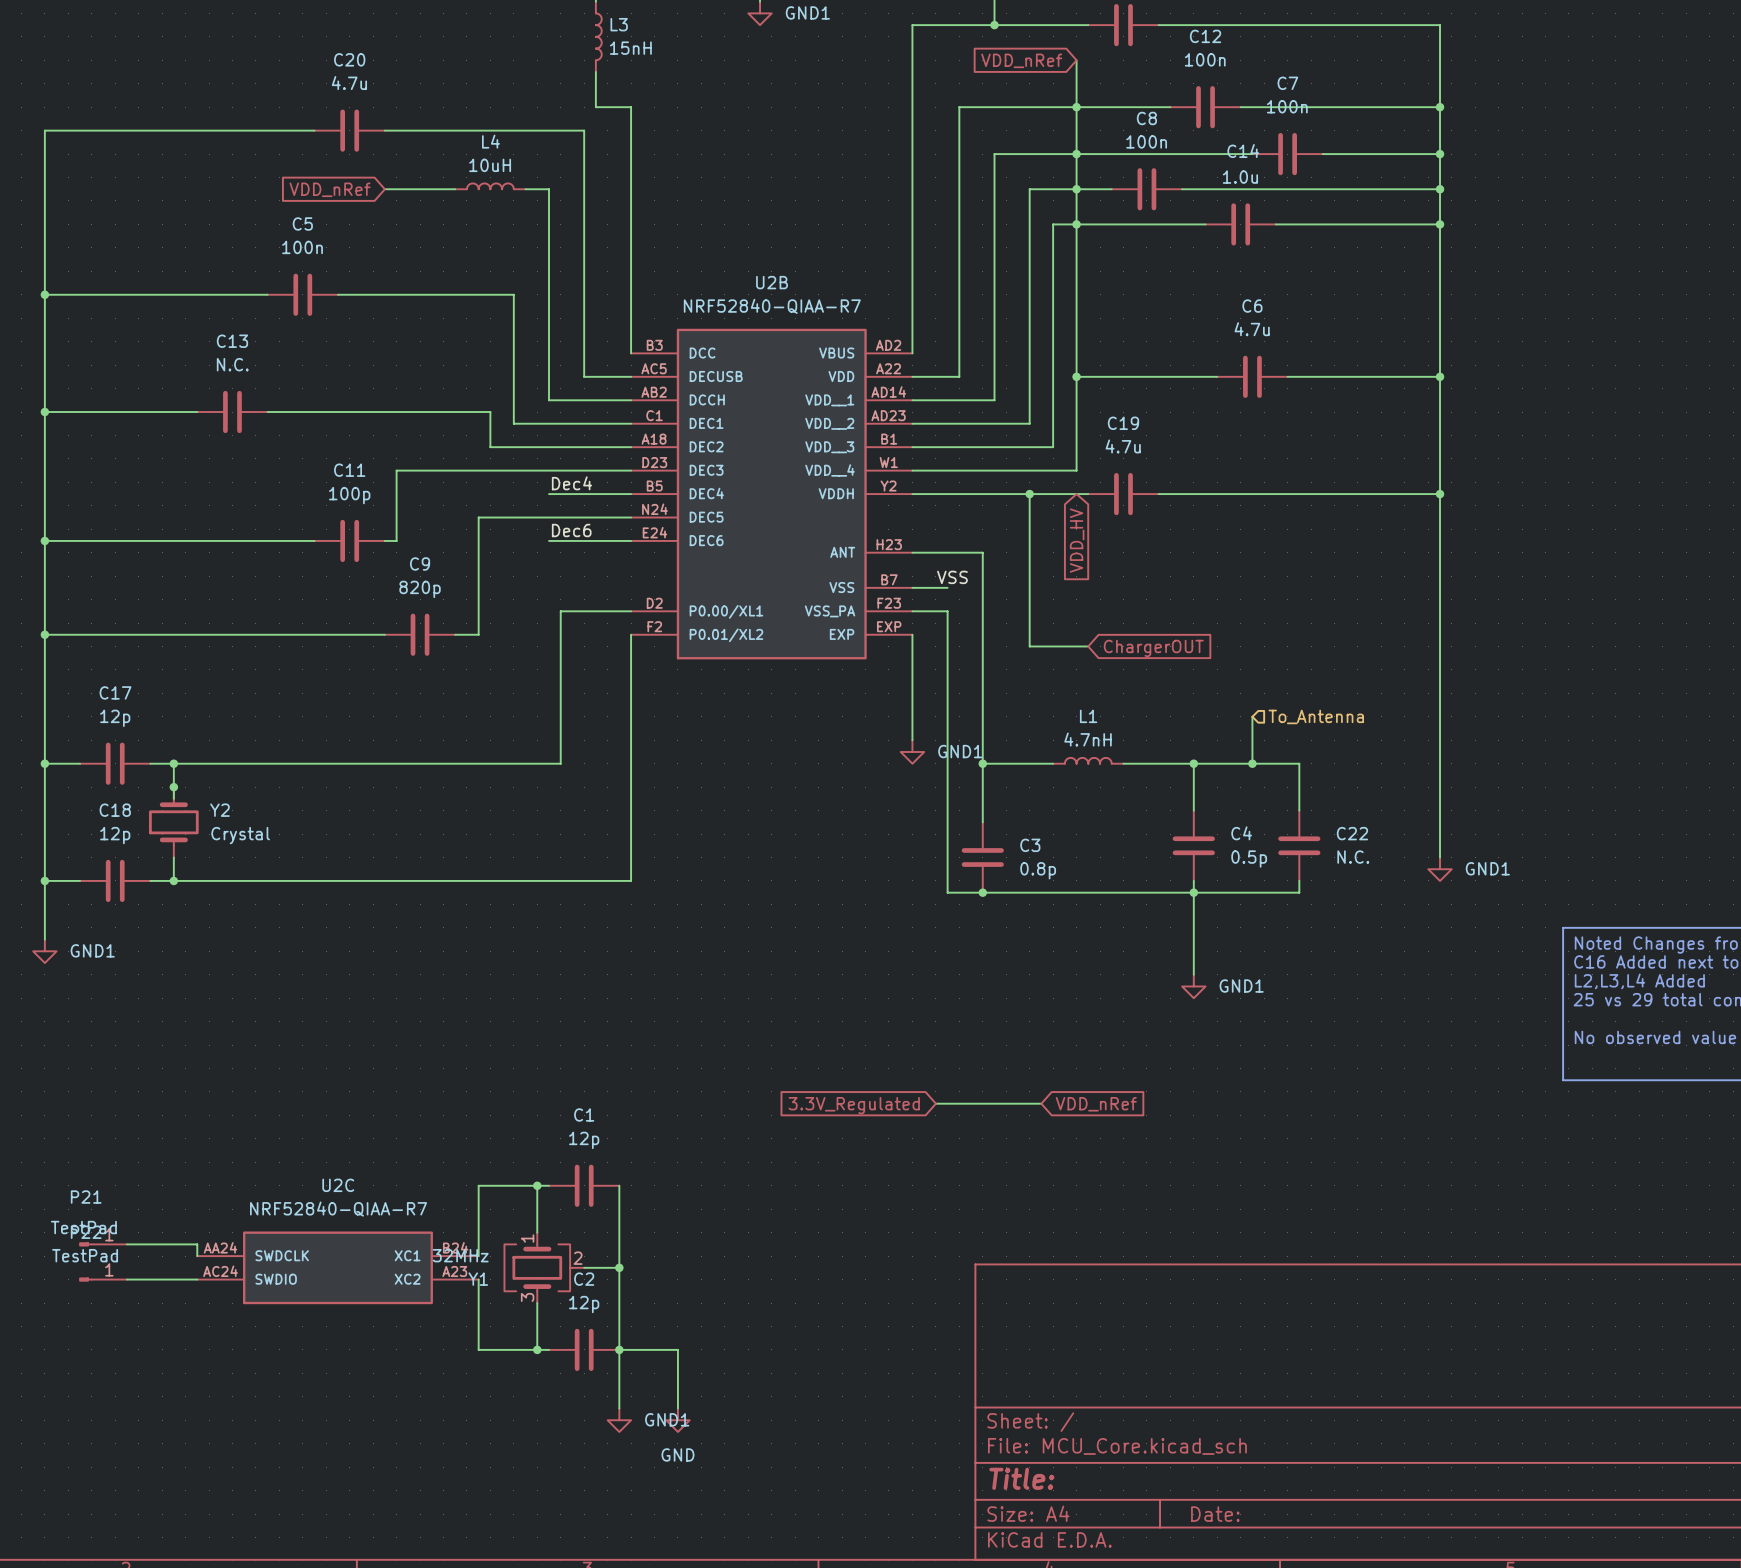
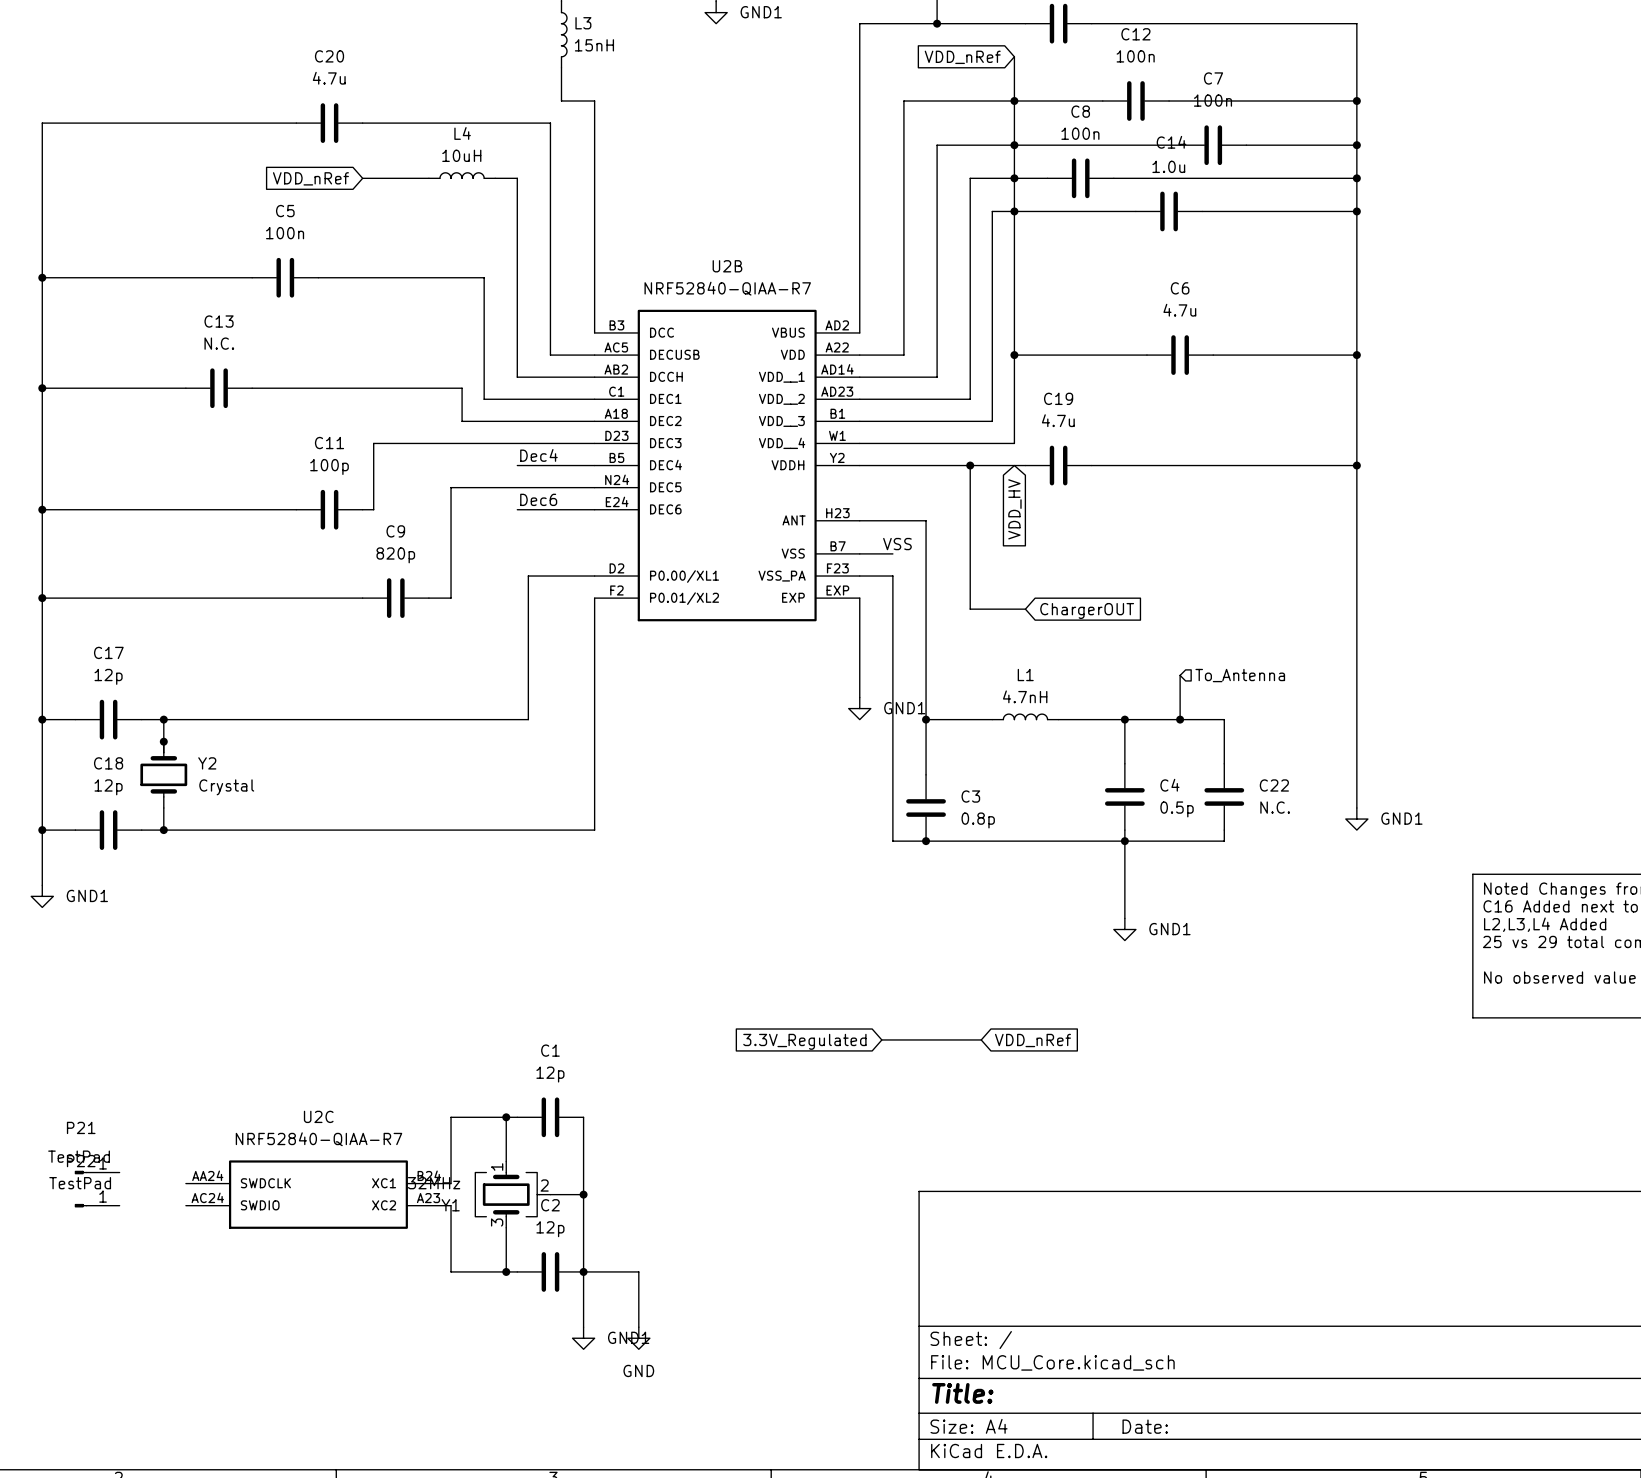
wire: (126, 1244) (197, 1244) (197, 1256) -> none
wire: (126, 1279) (197, 1279) -> none

